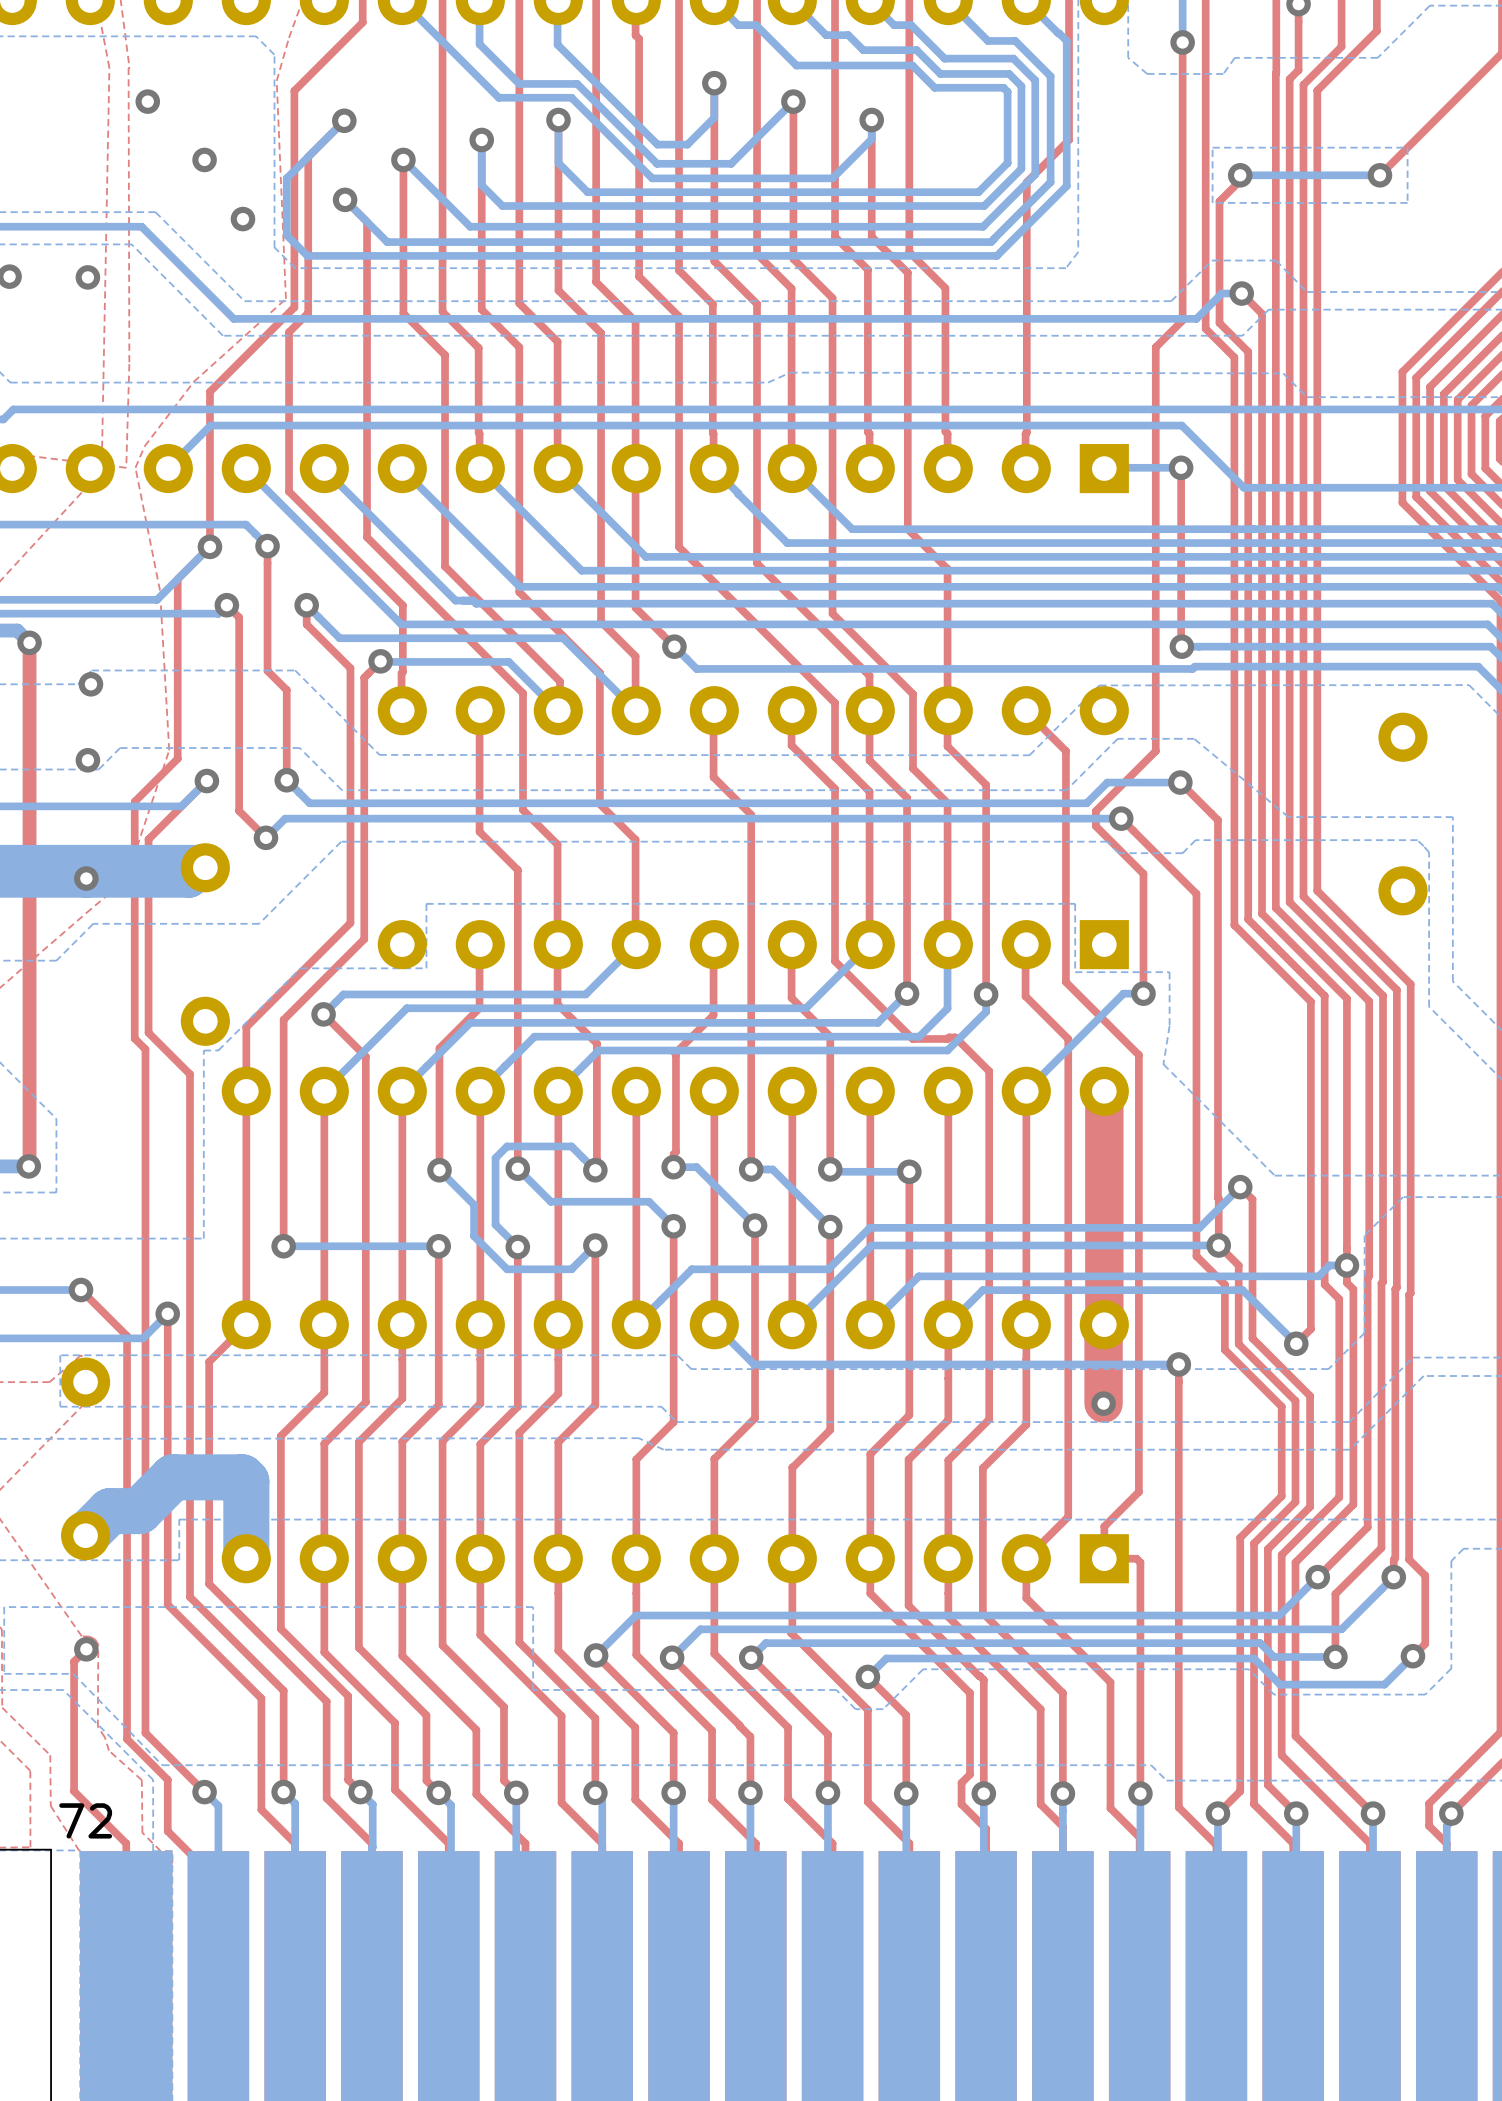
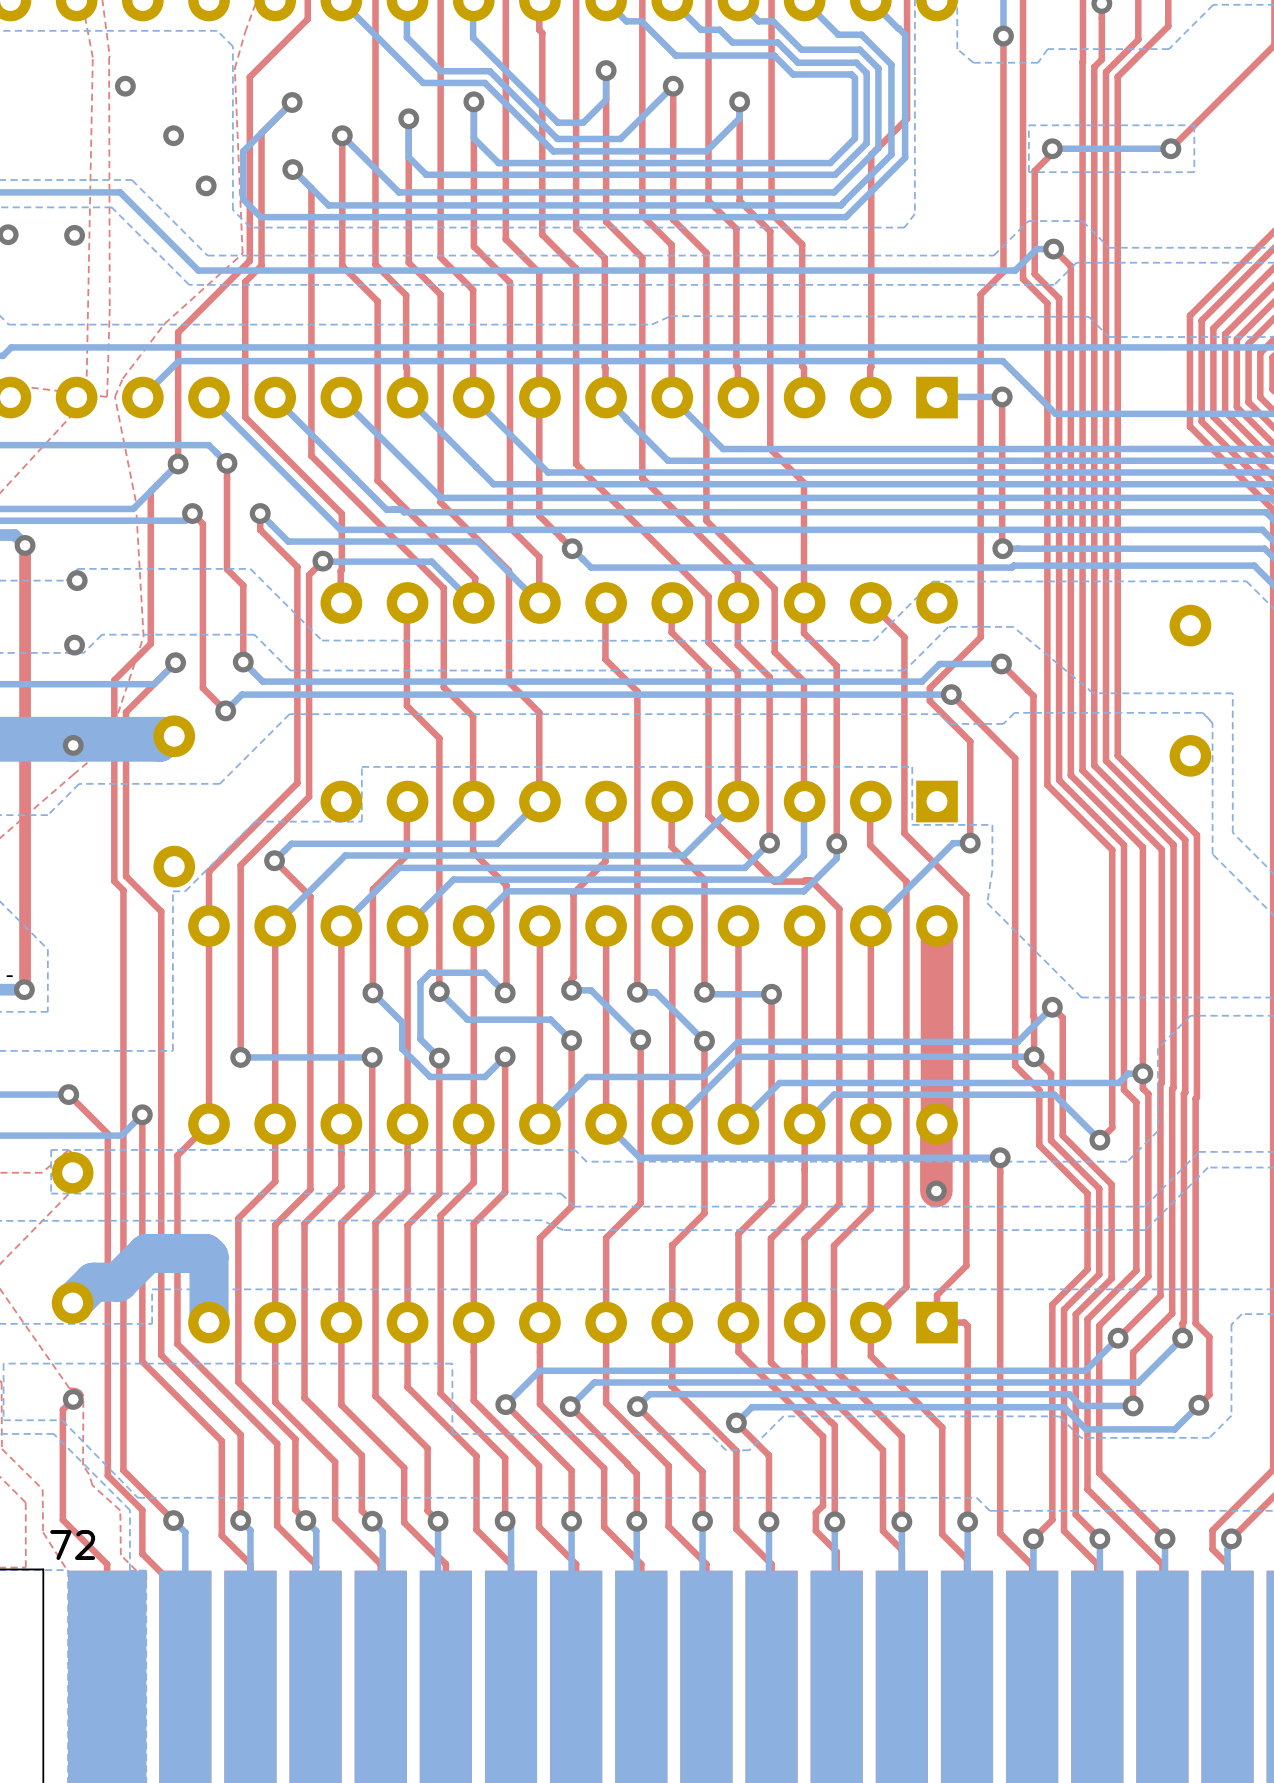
board edge: none -> (12, 976) (7, 976)

